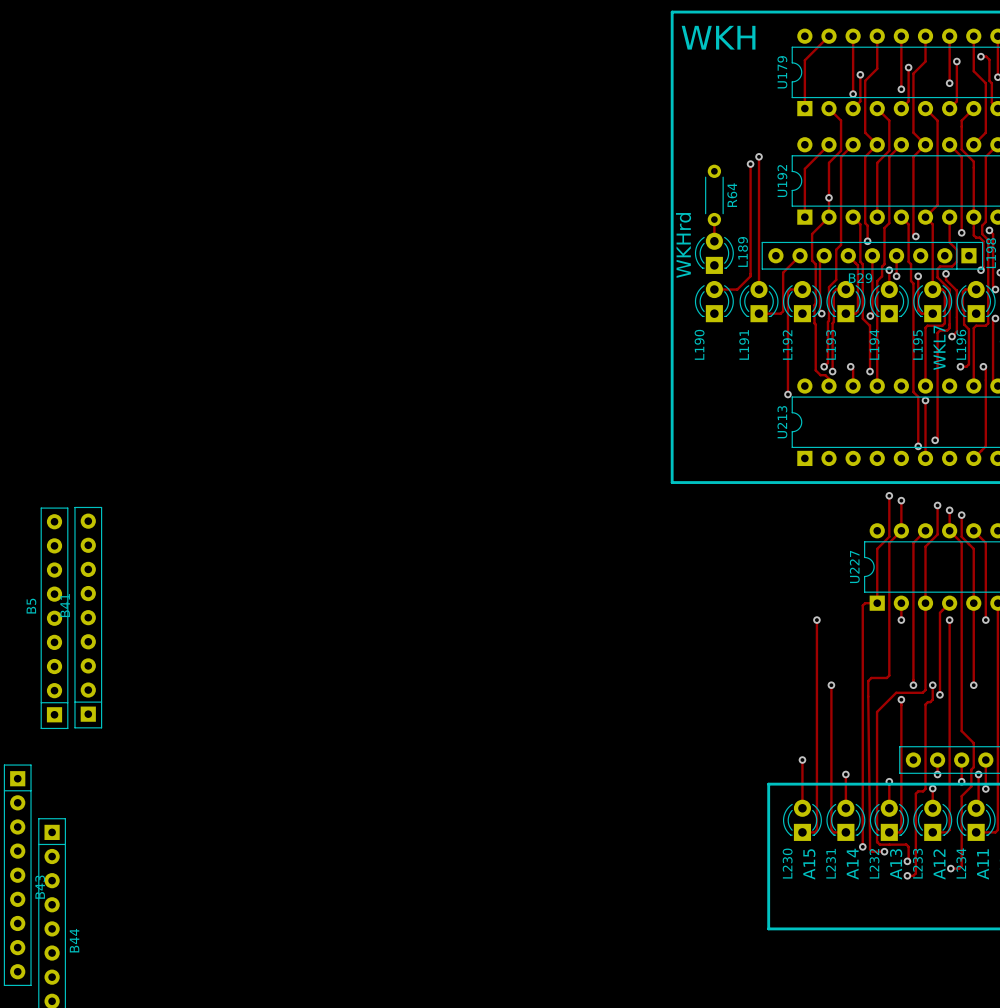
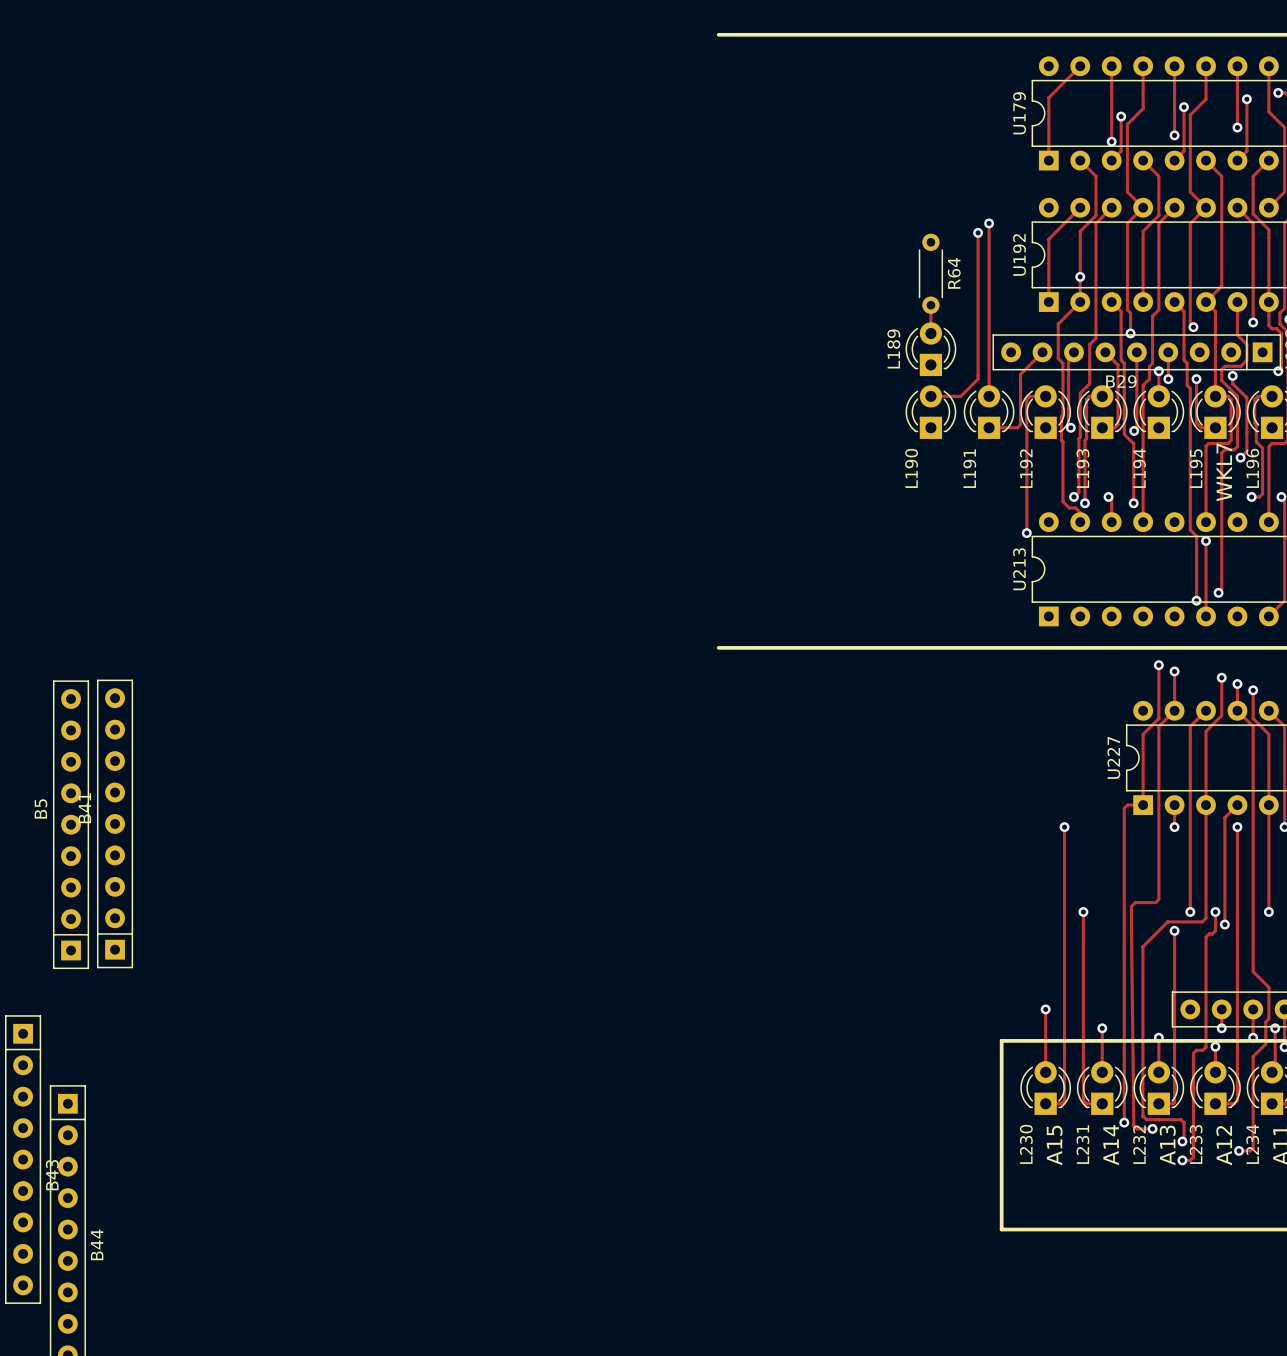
line: (672, 12) (672, 482) -> (875, 34) (718, 34)
text: WKH (718, 37) -> none
text: WKHrd (683, 245) -> none
L189 name position: L189 (742, 251) -> L189 (893, 348)
line: none -> (718, 647) (875, 647)

